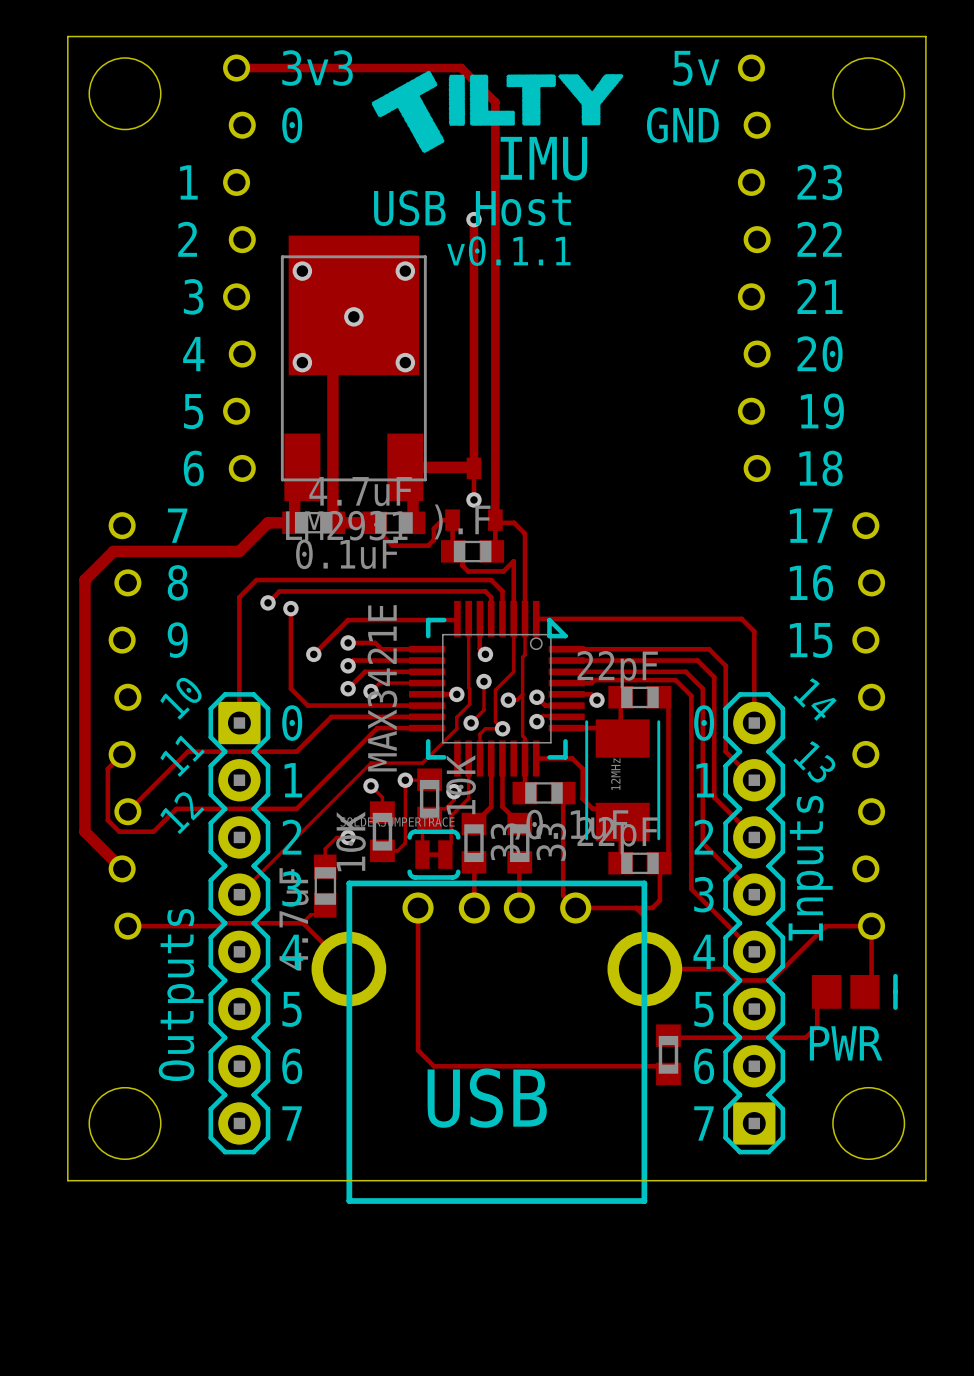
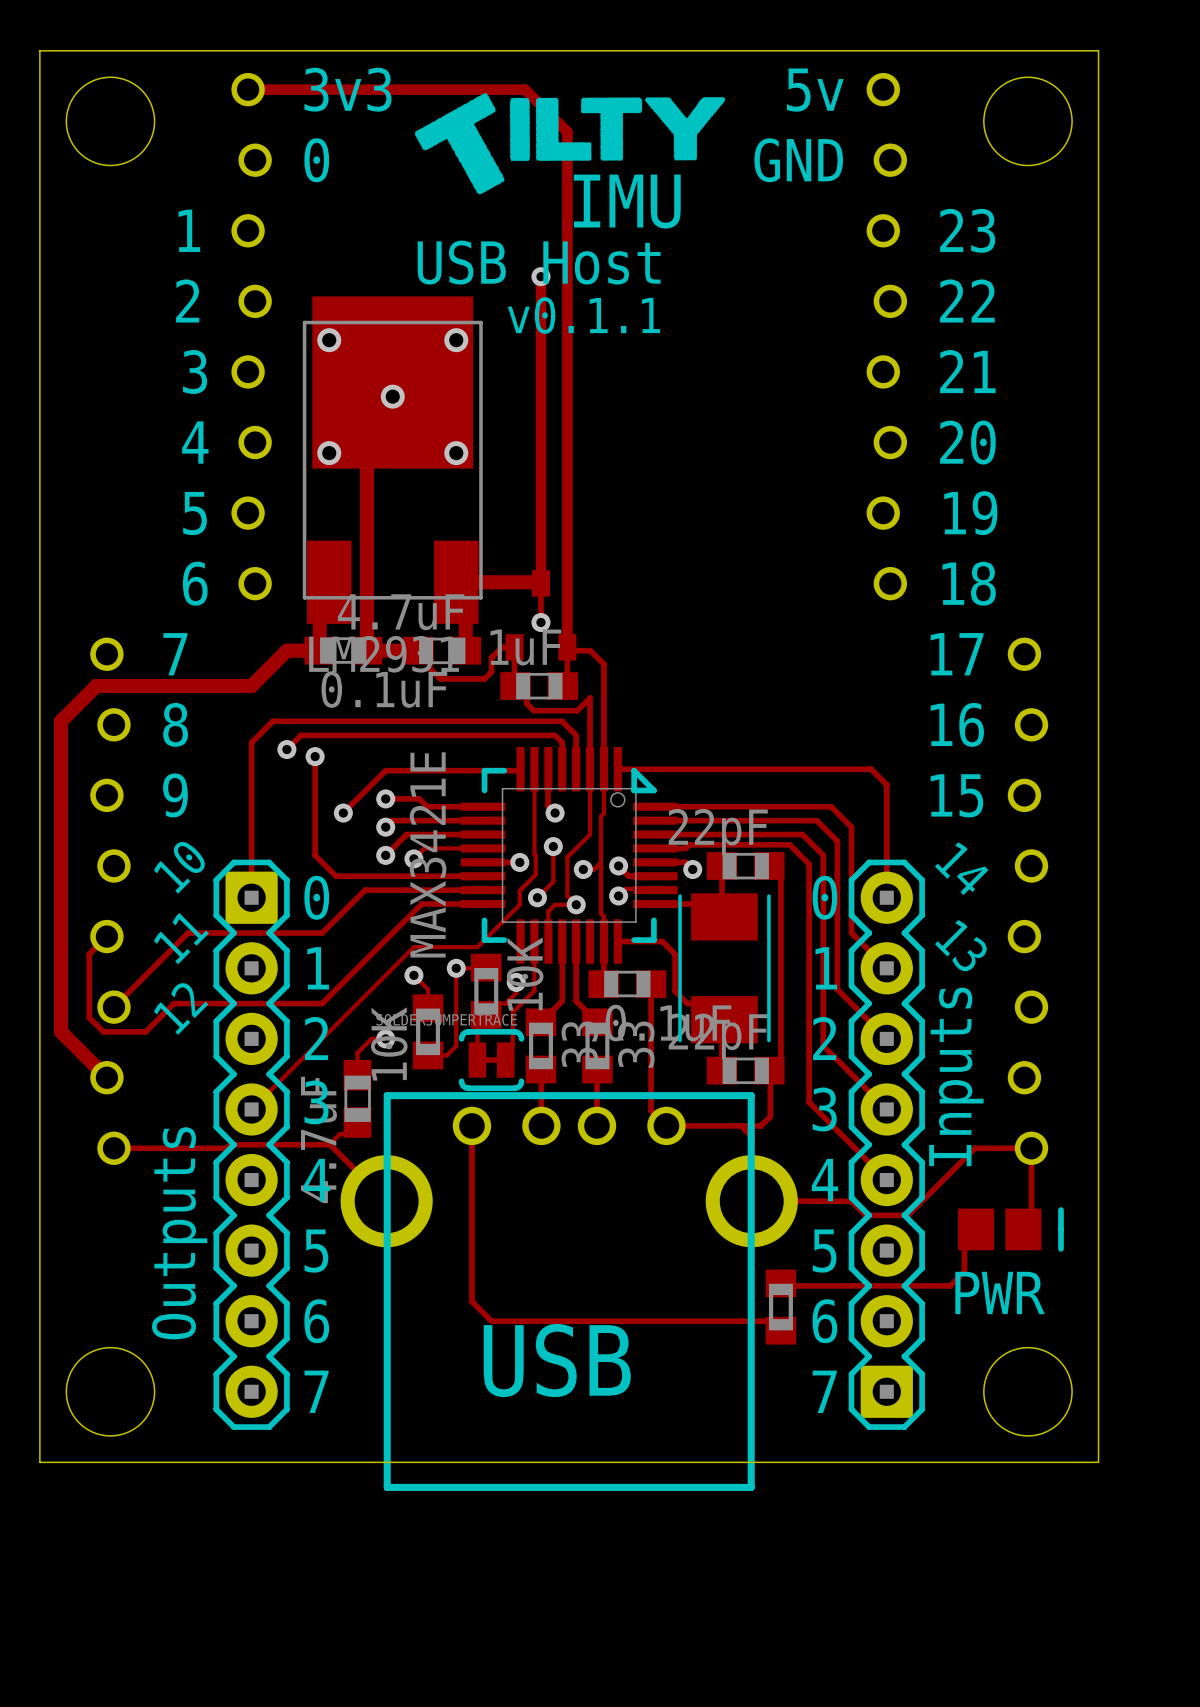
part value: ).F (462, 521) -> 1uF (525, 647)
part value: 12MHz (615, 774) -> none

